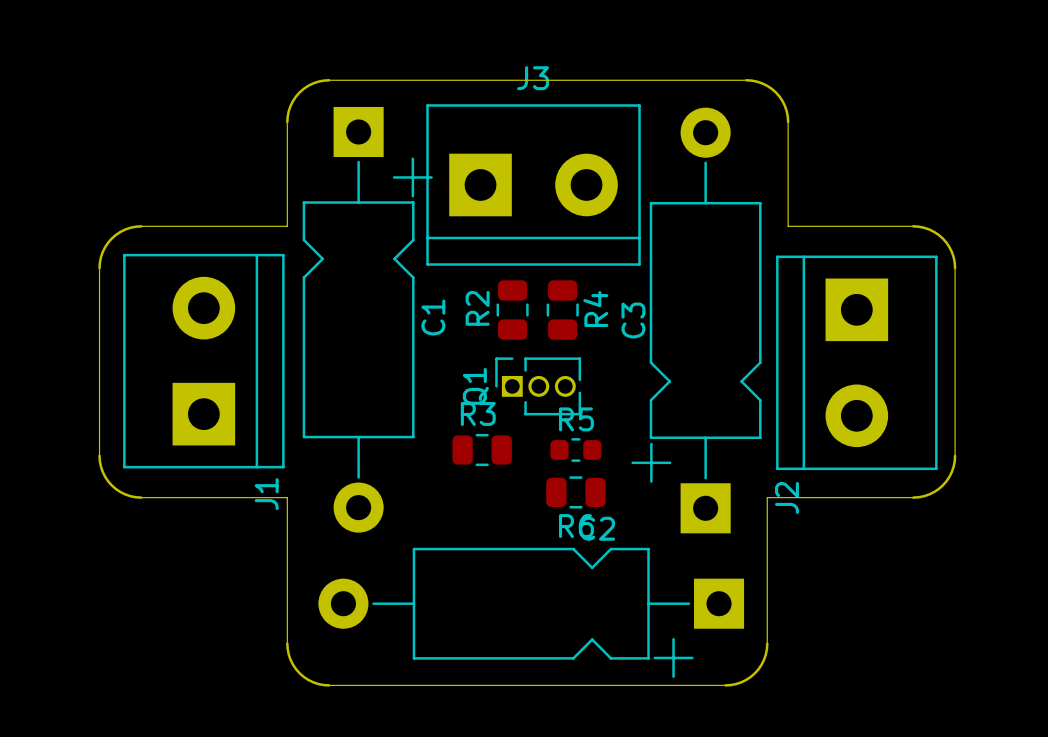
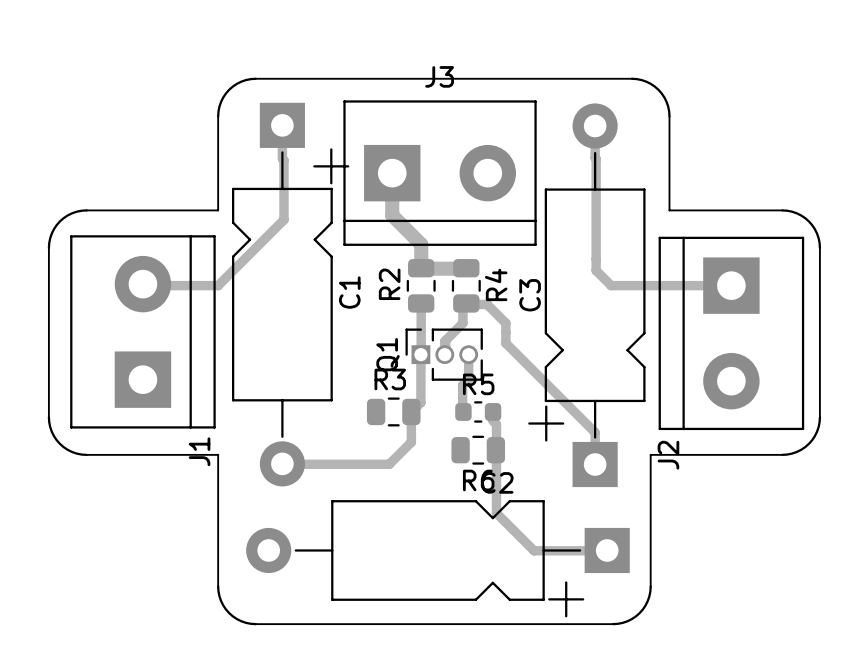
track: none -> (282, 125) (283, 219) (218, 285) (142, 285)
track: none -> (595, 126) (596, 270) (611, 285) (727, 285)
track: none -> (392, 173) (392, 215) (421, 244) (421, 268) (468, 268)
track: none -> (421, 303) (421, 355)
track: none -> (462, 304) (462, 323) (444, 341) (444, 354)
track: none -> (468, 304) (487, 304) (505, 323) (505, 343) (595, 432) (595, 464)
track: none -> (420, 354) (420, 402) (411, 411)
track: none -> (468, 354) (468, 379) (462, 385) (462, 413)
track: none -> (411, 411) (411, 442) (389, 464) (278, 464)
track: none -> (493, 411) (493, 420) (496, 424) (496, 513) (534, 550) (607, 550)

